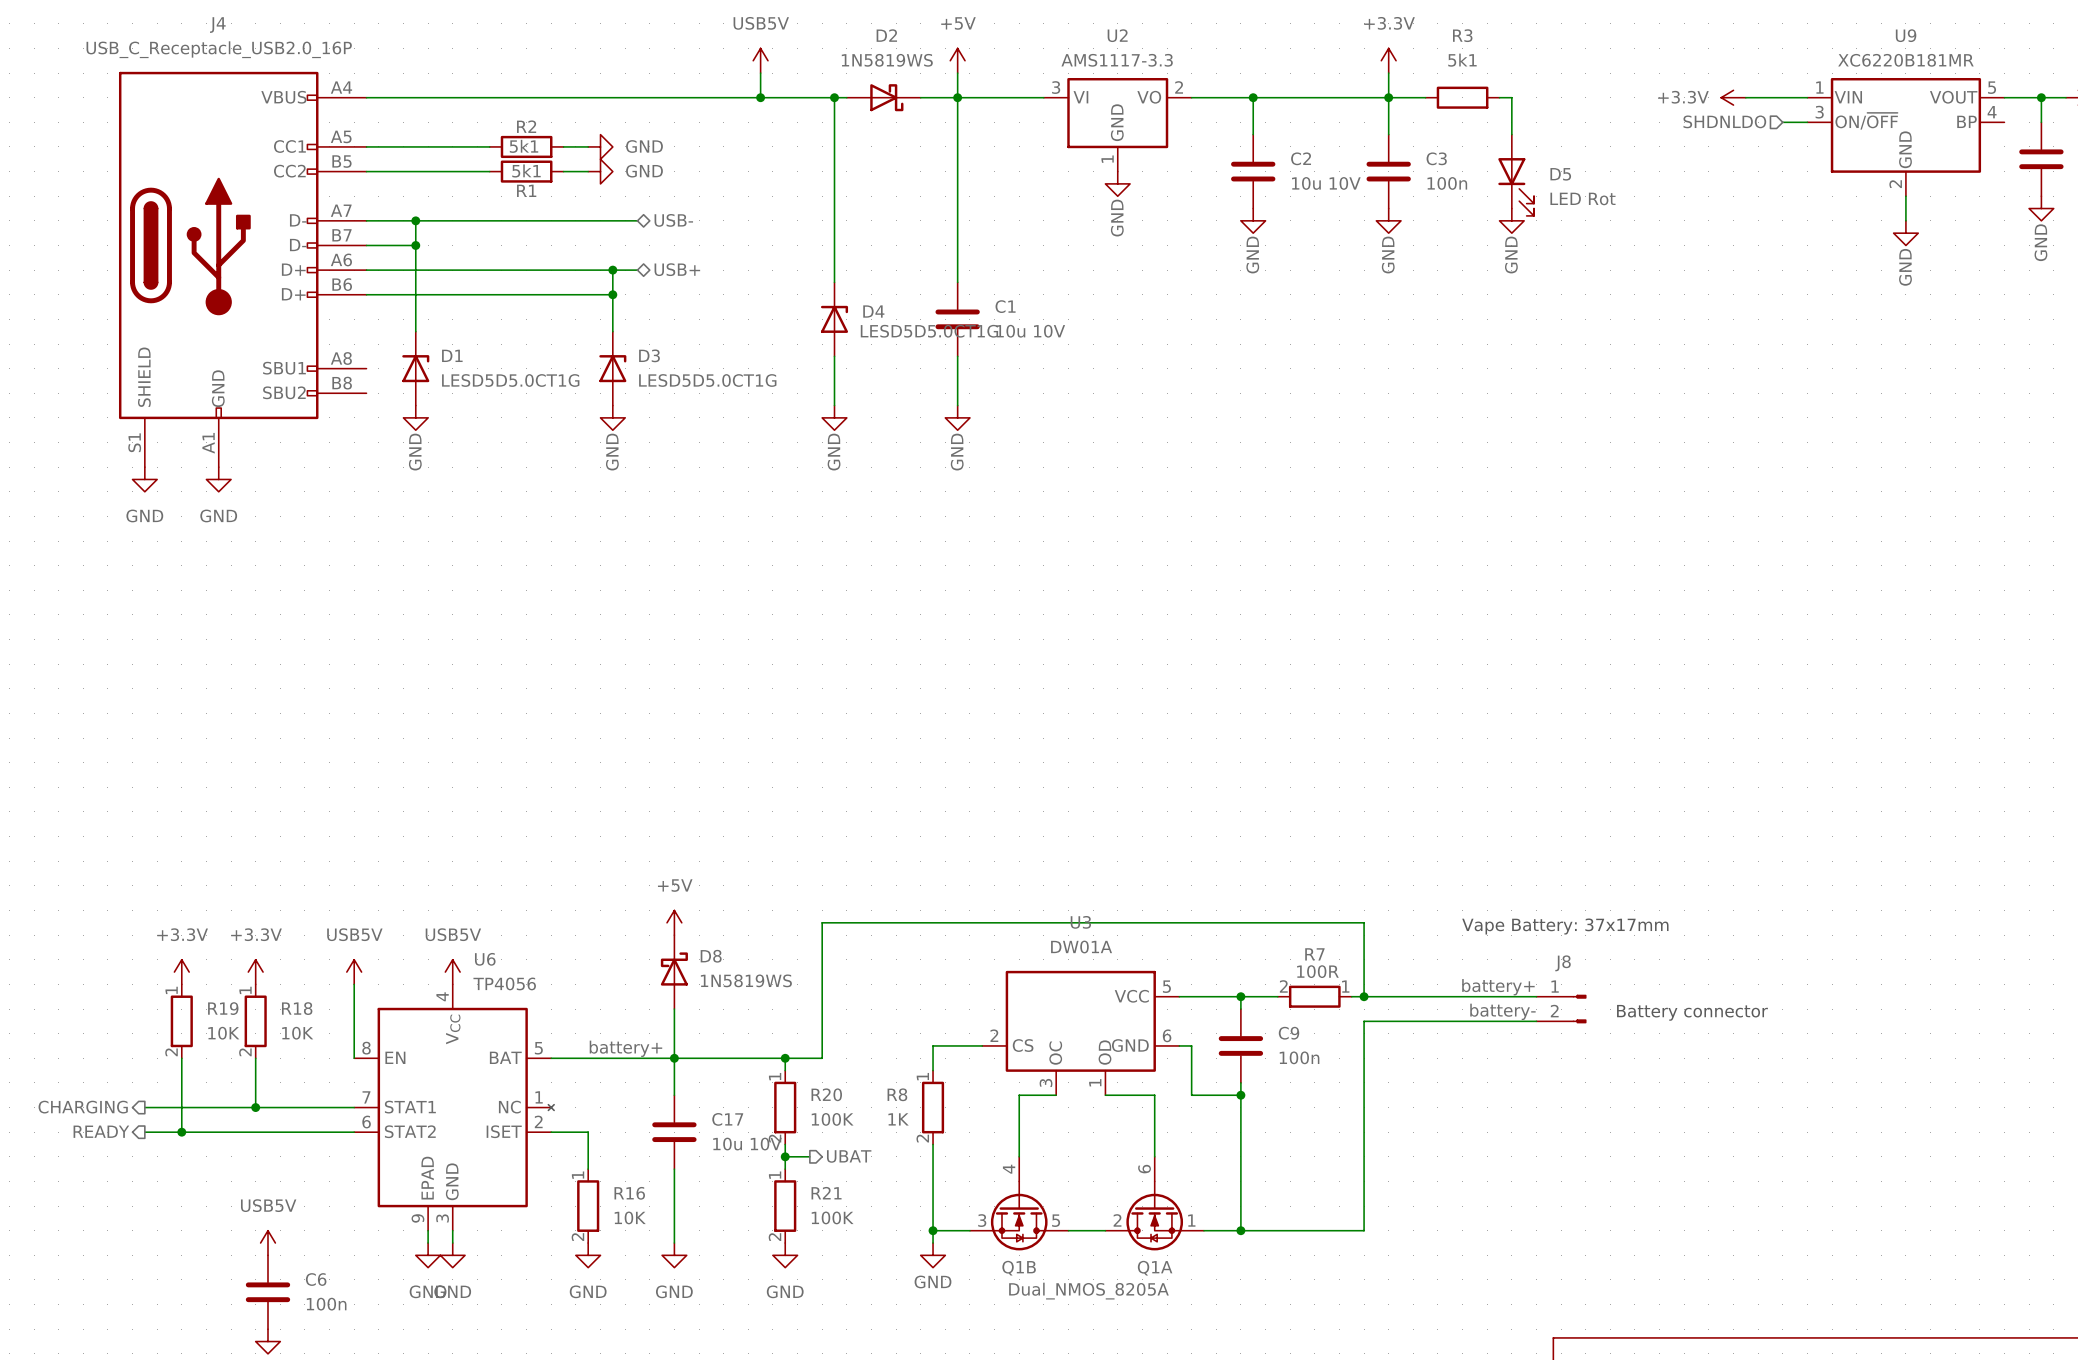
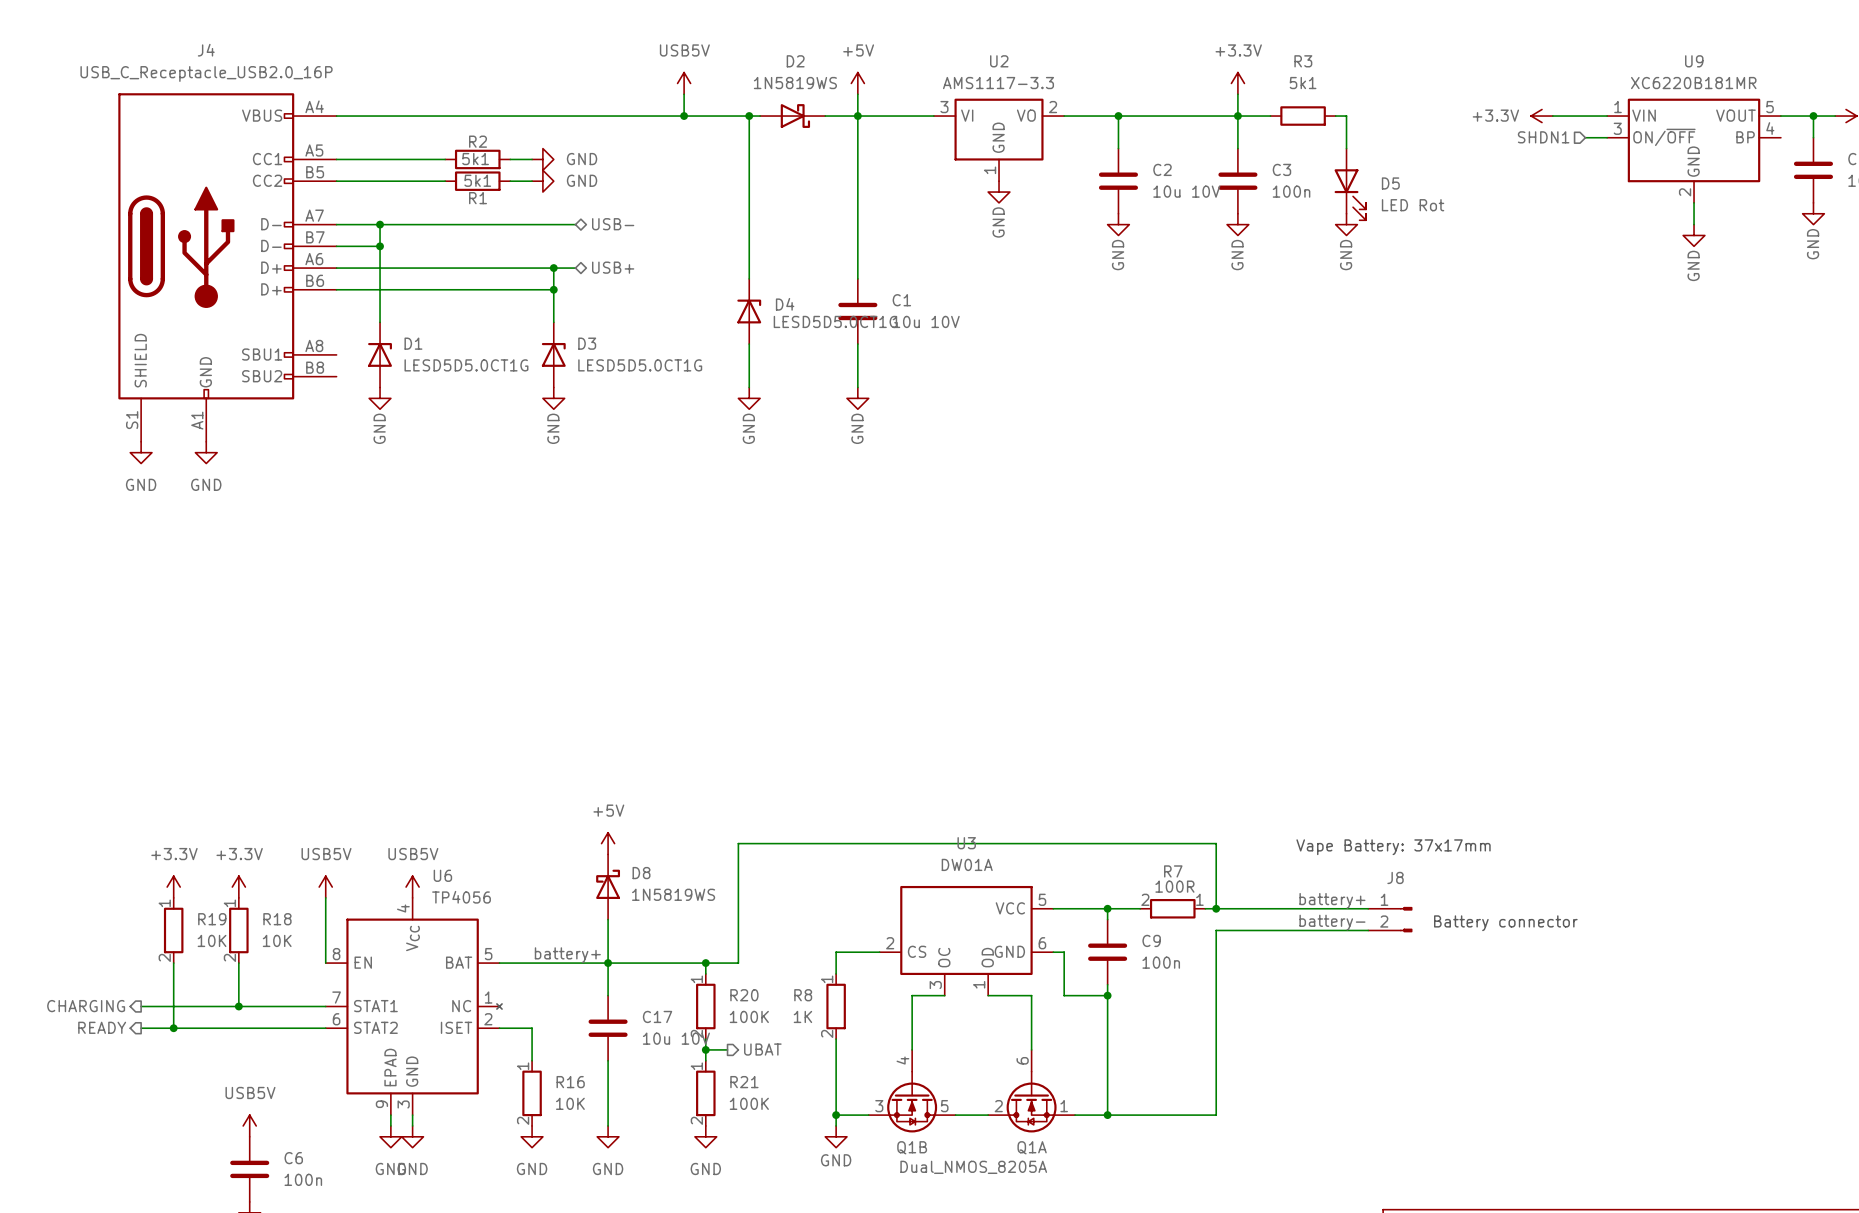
hierarchical label: SHDNLDO (1724, 121) -> SHDN1 (1543, 137)

